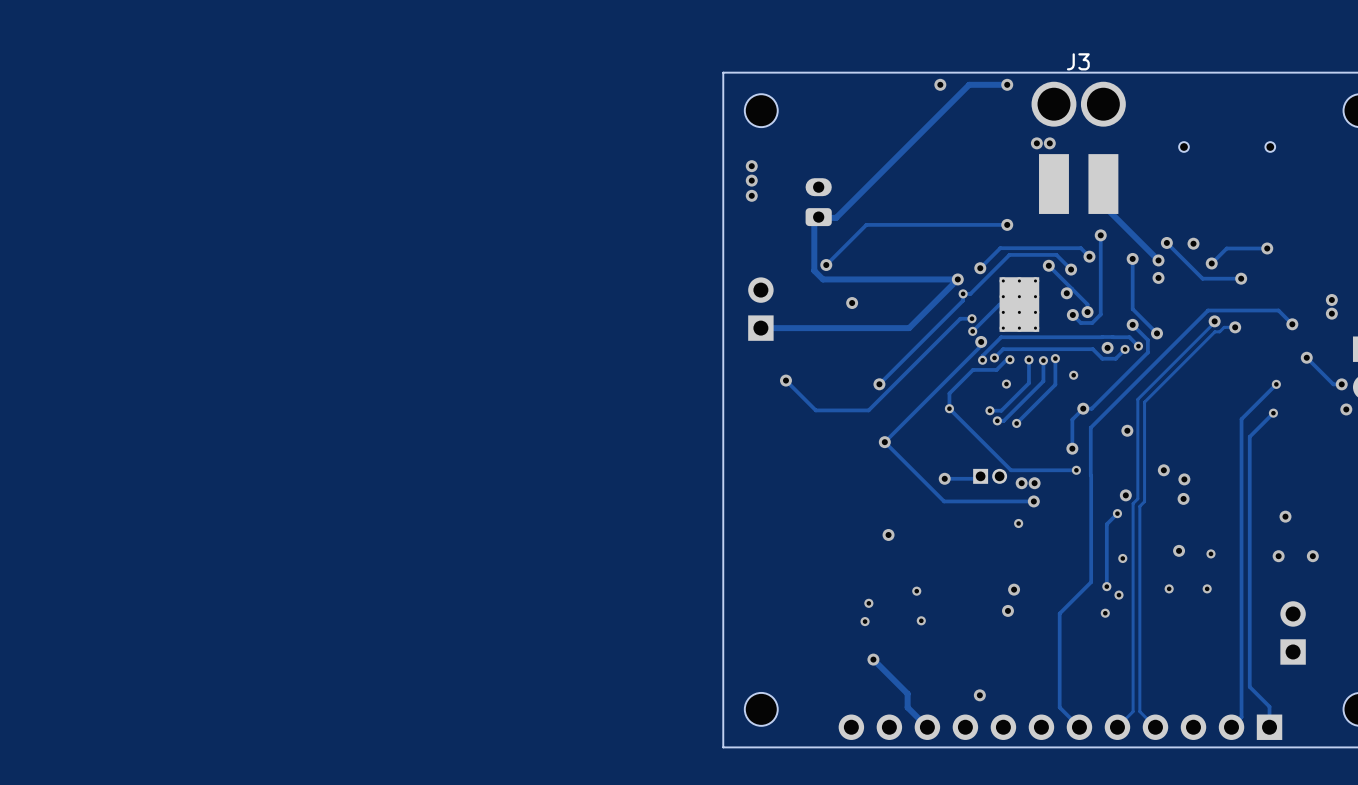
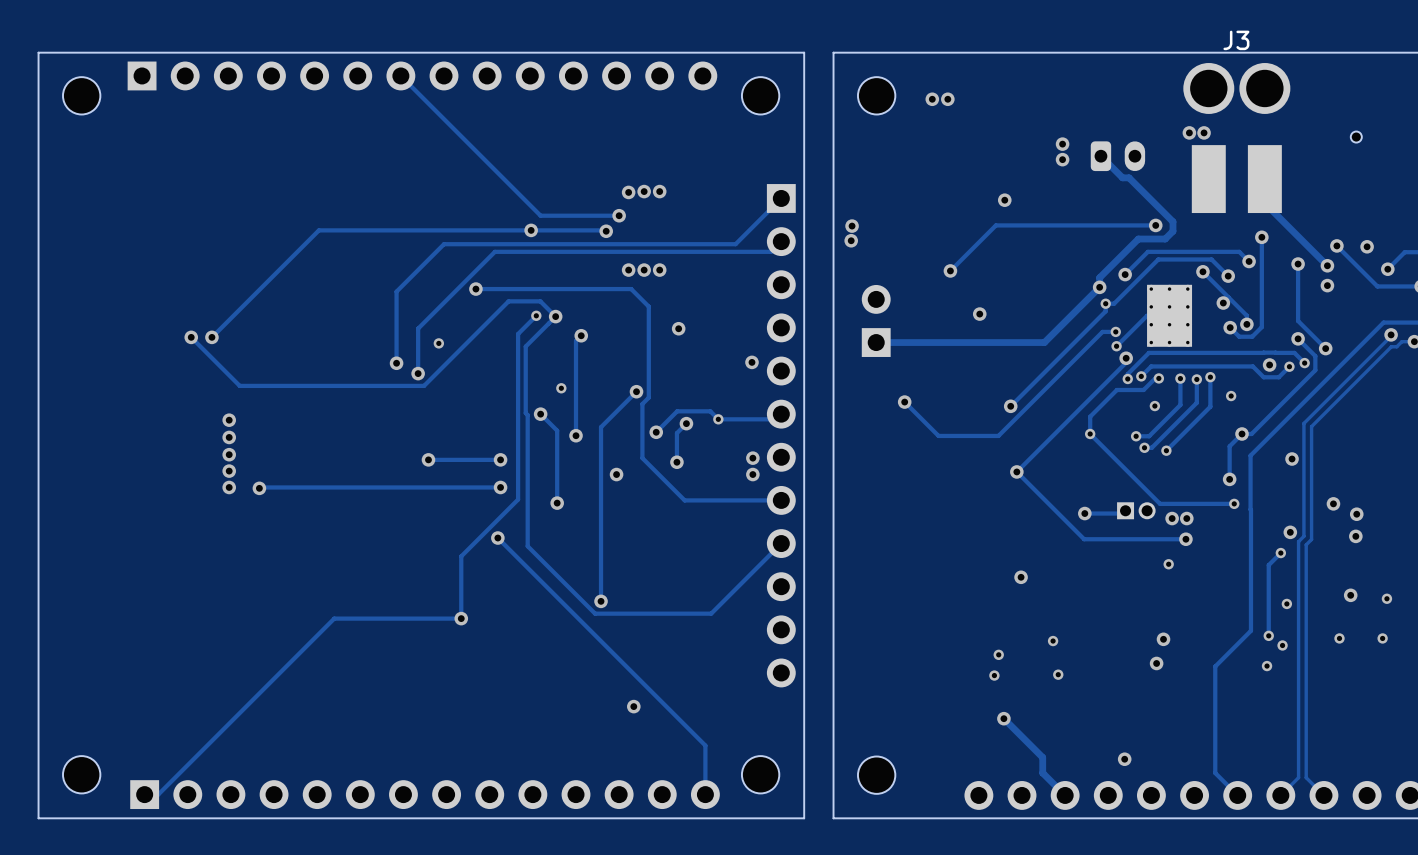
board edge: none -> (804, 52) (804, 818) (38, 818) (38, 52) (804, 52)
via: (940, 84) -> none
track: (1007, 84) (969, 84) (836, 217) (818, 217) (814, 221) (814, 270) (823, 279) (957, 279) -> (1100, 156) (1122, 177) (1129, 177) (1172, 221) (1172, 231) (1165, 239) (1138, 239) (1099, 277) (1099, 287)
via: (1007, 84) -> none
track: none -> (400, 75) (540, 215) (619, 215)
part: none -> (422, 75)
part: none -> (81, 95)
part: none -> (760, 95)
via: none -> (932, 99)
via: none -> (947, 99)
via: none -> (1062, 144)
via: (751, 166) -> none
via: none -> (1062, 159)
via: (751, 180) -> none
via: none -> (628, 192)
via: none -> (644, 191)
via: none -> (659, 191)
via: (751, 195) -> none
track: none -> (781, 198) (735, 244) (444, 244) (396, 291) (396, 363)
part rotation: 0° (818, 202) -> 90° clockwise (1117, 156)
part position: (818, 202) -> (1117, 156)
via: none -> (1004, 200)
via: none -> (619, 215)
via: none -> (852, 226)
via: none -> (531, 230)
track: none -> (606, 231) (318, 230) (211, 337)
via: none -> (606, 231)
via: none -> (851, 240)
track: none -> (781, 241) (771, 251) (494, 251) (418, 328) (418, 373)
via: none -> (628, 270)
via: none -> (644, 270)
via: none -> (659, 270)
track: none -> (475, 289) (631, 289) (648, 306) (648, 397) (642, 404) (642, 458) (684, 500) (781, 500)
via: none -> (475, 289)
track: none -> (536, 315) (518, 334) (518, 499) (461, 556) (461, 618) (334, 618) (158, 794) (144, 794)
via: none -> (536, 315)
via: none -> (555, 316)
via: none -> (678, 328)
track: none -> (581, 335) (576, 340) (576, 435)
via: none -> (581, 335)
track: none -> (191, 337) (239, 385) (424, 385) (508, 301) (540, 301) (555, 316) (525, 346) (527, 546) (595, 613) (711, 613) (781, 543)
via: none -> (191, 337)
via: none -> (211, 337)
via: none -> (438, 343)
via: none -> (752, 362)
via: none -> (396, 363)
via: none -> (418, 373)
via: none -> (561, 388)
track: none -> (636, 391) (601, 427) (601, 601)
via: none -> (636, 391)
track: none -> (540, 414) (557, 430) (557, 503)
via: none -> (540, 414)
via: none -> (718, 419)
track: none -> (776, 419) (718, 419) (710, 411) (677, 411) (656, 432)
via: none -> (229, 420)
track: none -> (686, 423) (676, 433) (676, 462)
via: none -> (686, 423)
via: none -> (656, 432)
via: none -> (576, 435)
part: none -> (781, 435)
via: none -> (229, 437)
via: none -> (229, 454)
via: none -> (752, 458)
via: none -> (428, 459)
track: none -> (500, 459) (428, 459)
via: none -> (500, 459)
via: none -> (676, 462)
via: none -> (229, 471)
via: none -> (616, 474)
via: none -> (752, 474)
via: none -> (229, 487)
track: none -> (500, 487) (259, 488)
via: none -> (500, 487)
via: none -> (259, 488)
via: none -> (557, 503)
track: none -> (497, 538) (705, 745) (705, 794)
via: none -> (497, 538)
via: none -> (601, 601)
via: none -> (461, 618)
via: none -> (633, 706)
part: none -> (81, 774)
part: none -> (760, 774)
part: none -> (425, 794)

